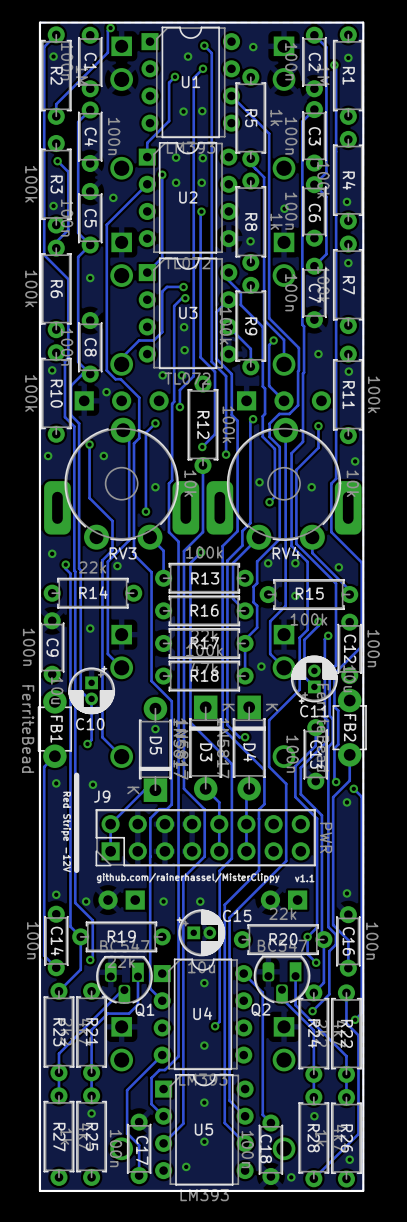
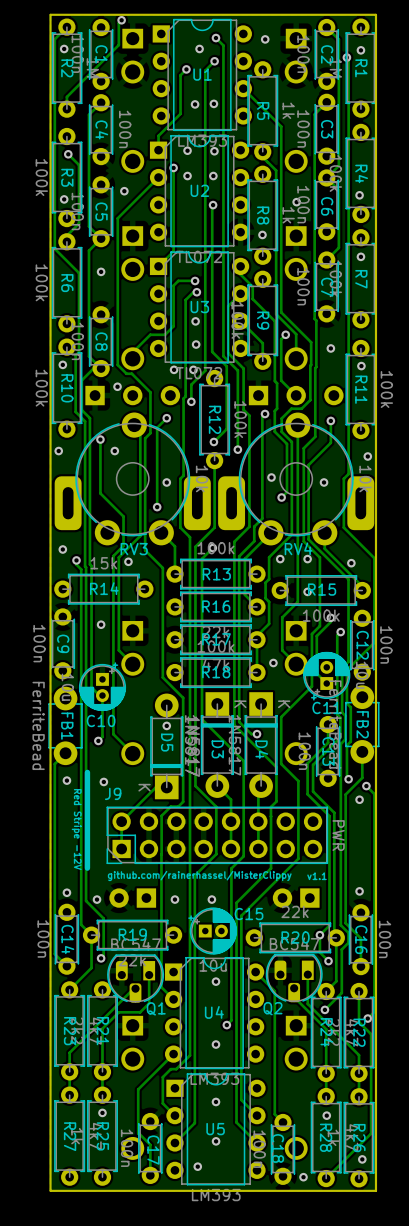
R14 value: 22k (92, 567) -> 15k (103, 563)

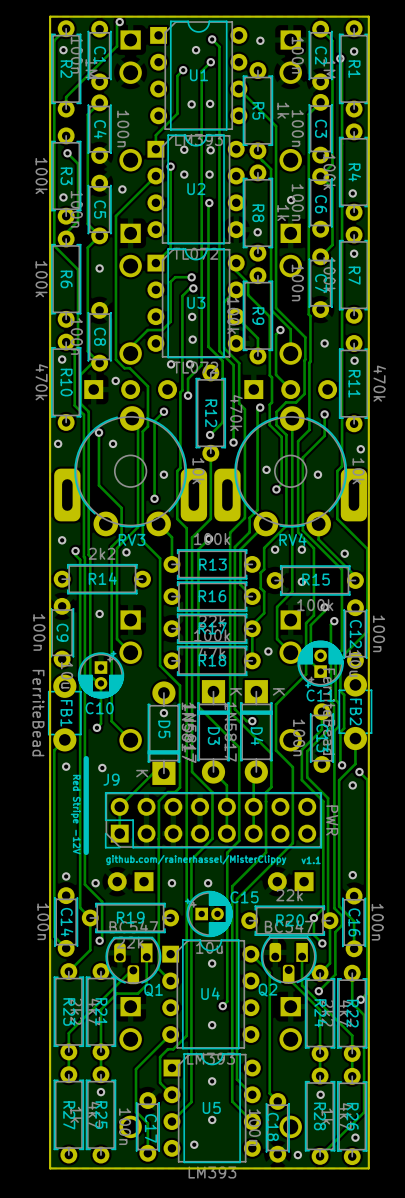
R10 value: 100k (41, 388) -> 470k (41, 382)
R11 value: 100k (386, 389) -> 470k (379, 383)
R12 value: 100k (240, 419) -> 470k (236, 413)
R14 value: 15k (103, 563) -> 2k2 (102, 553)

